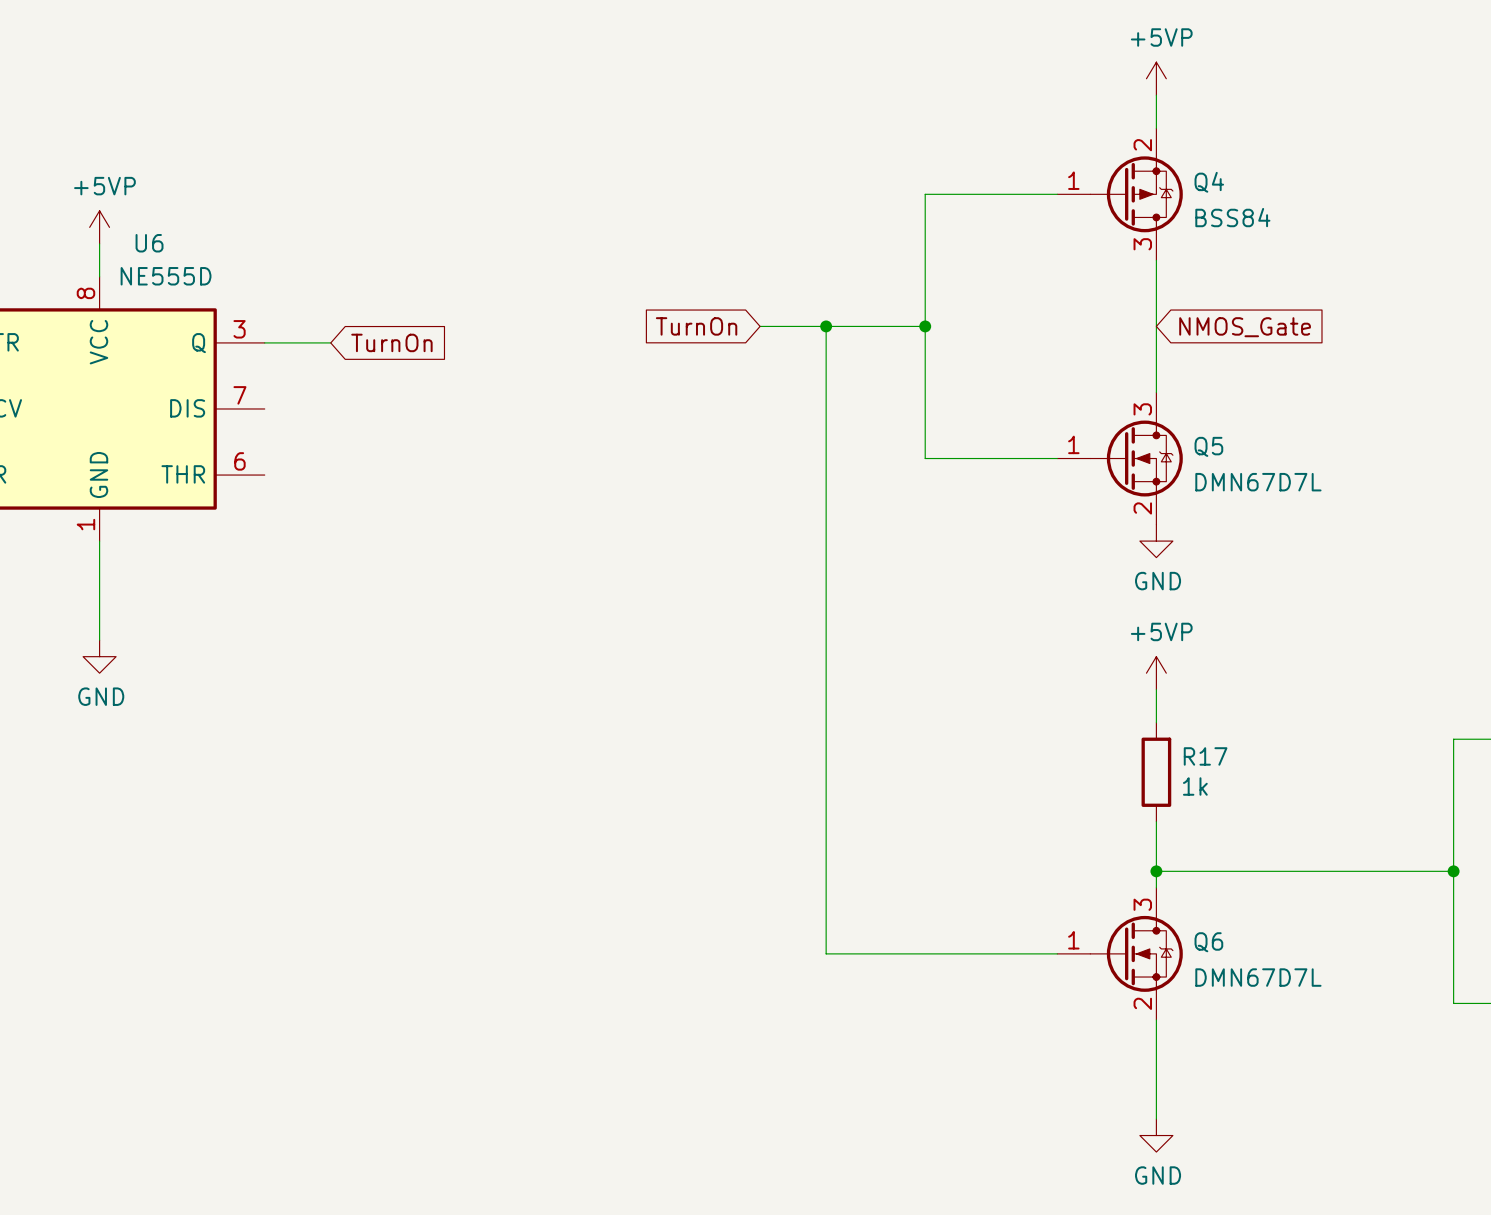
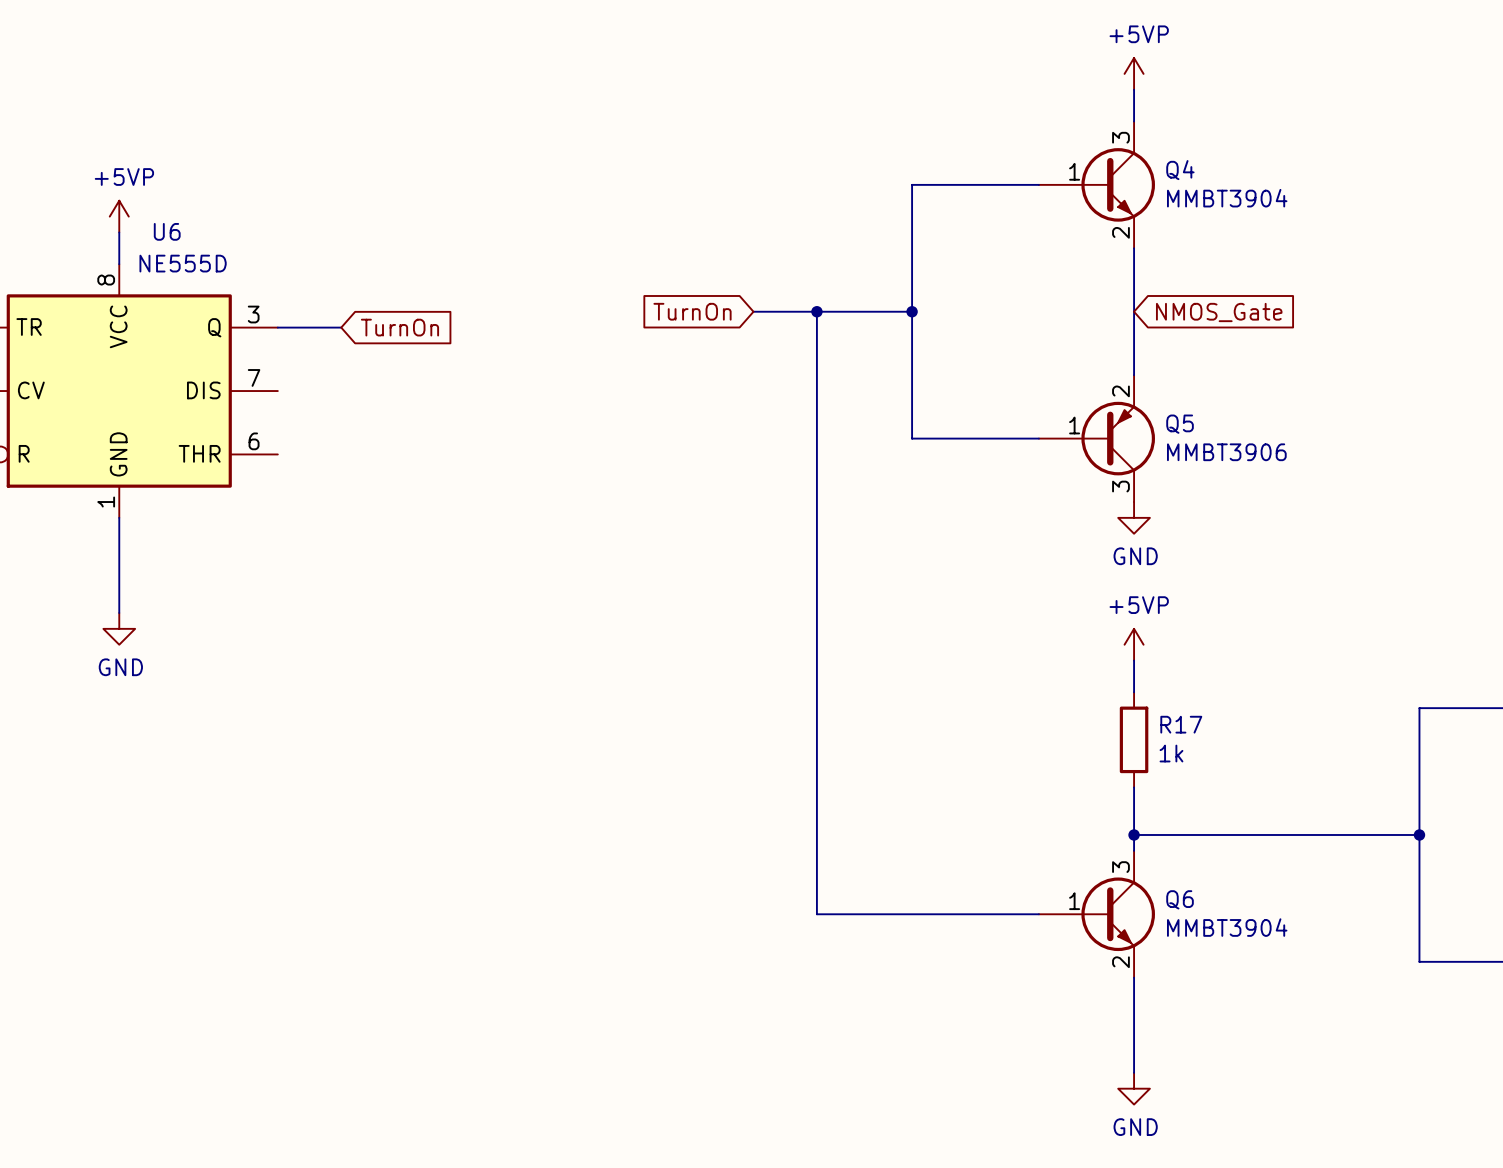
Q4 symbol: [1057, 128, 1183, 261] -> [1038, 121, 1155, 249]
Q4 value: BSS84 (1232, 217) -> MMBT3904 (1227, 198)
Q5 symbol: [1057, 392, 1183, 525] -> [1038, 375, 1155, 503]
Q5 value: DMN67D7L (1258, 482) -> MMBT3906 (1226, 452)
Q6 symbol: [1057, 887, 1183, 1020] -> [1038, 850, 1155, 978]
Q6 value: DMN67D7L (1258, 977) -> MMBT3904 (1227, 927)

